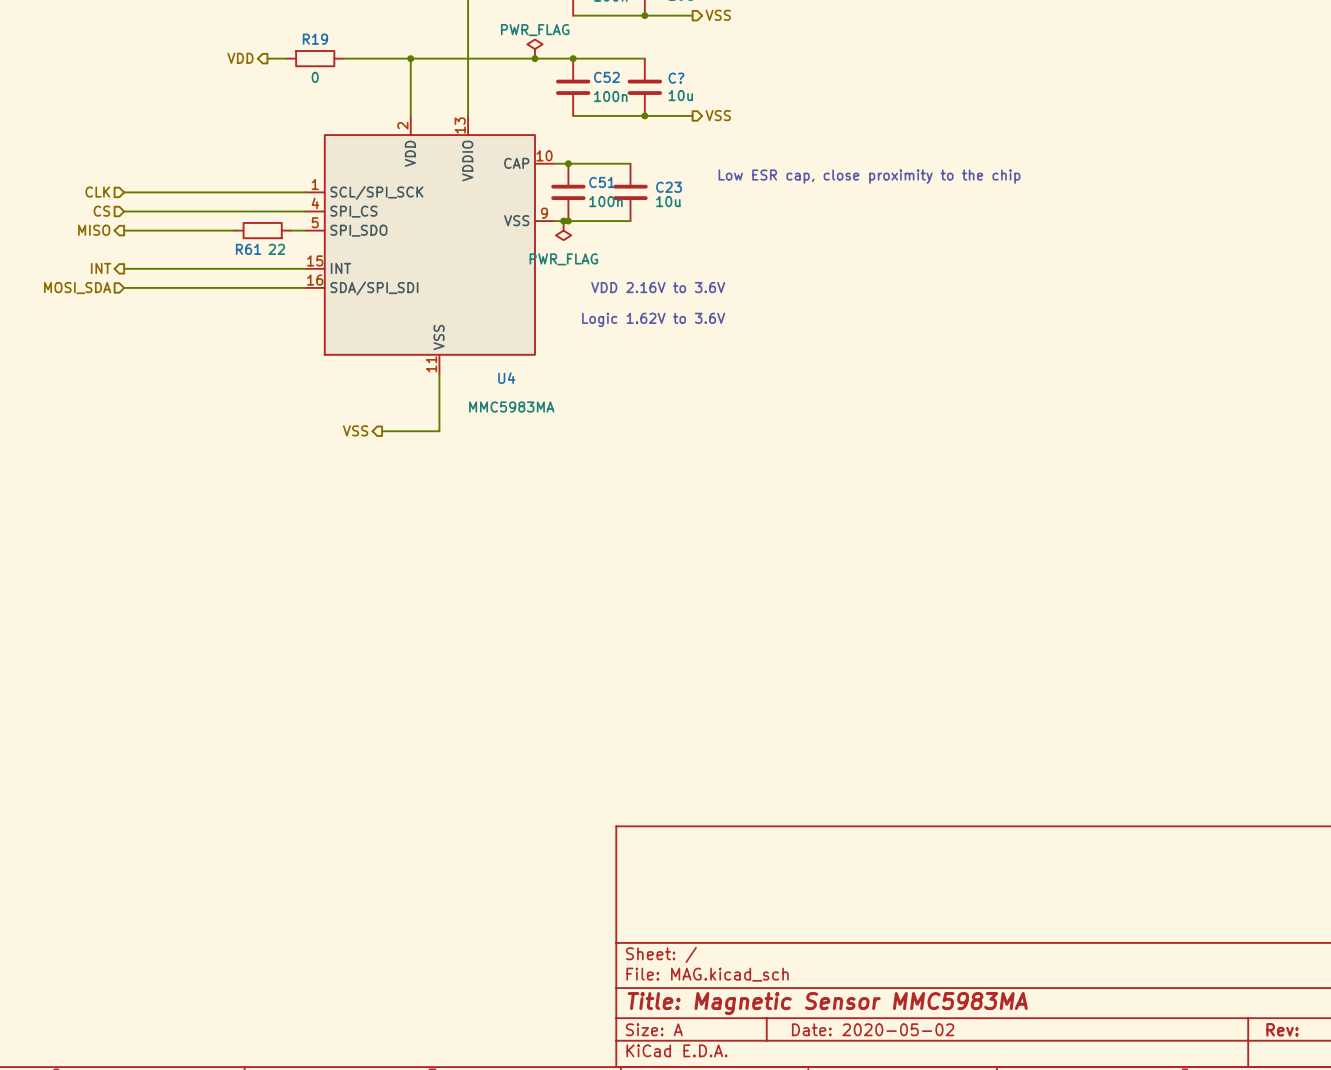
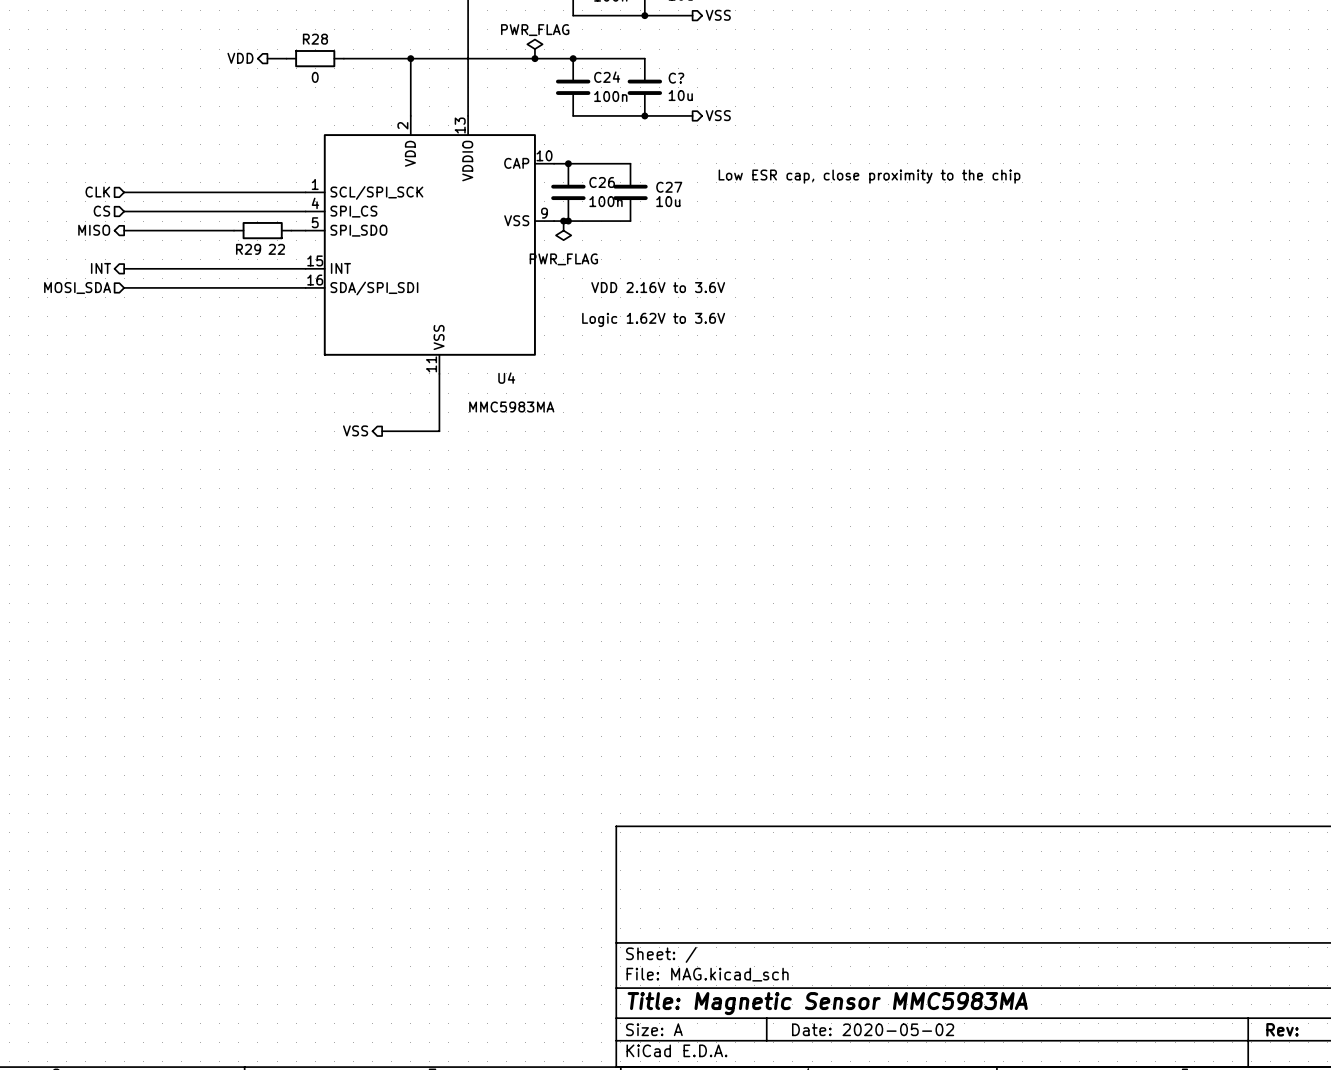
R19 name: R19 (315, 39) -> R28 (315, 39)
C52 name: C52 (606, 77) -> C24 (607, 77)
C51 name: C51 (602, 182) -> C26 (602, 182)
C23 name: C23 (669, 187) -> C27 (669, 187)
R61 name: R61 (248, 249) -> R29 (248, 249)

